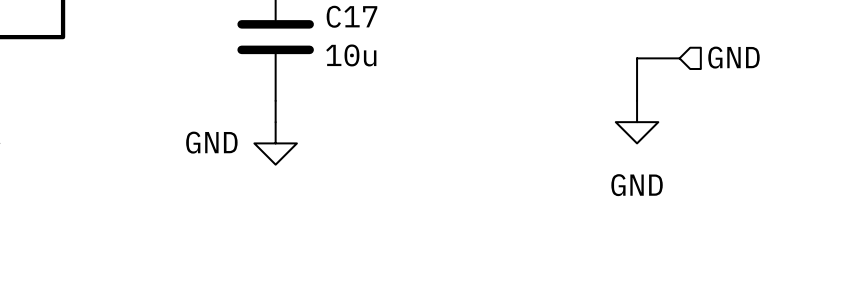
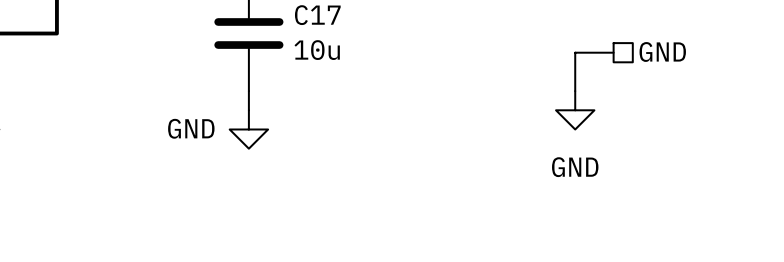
hierarchical label shape: input (733, 57) -> passive (662, 51)

